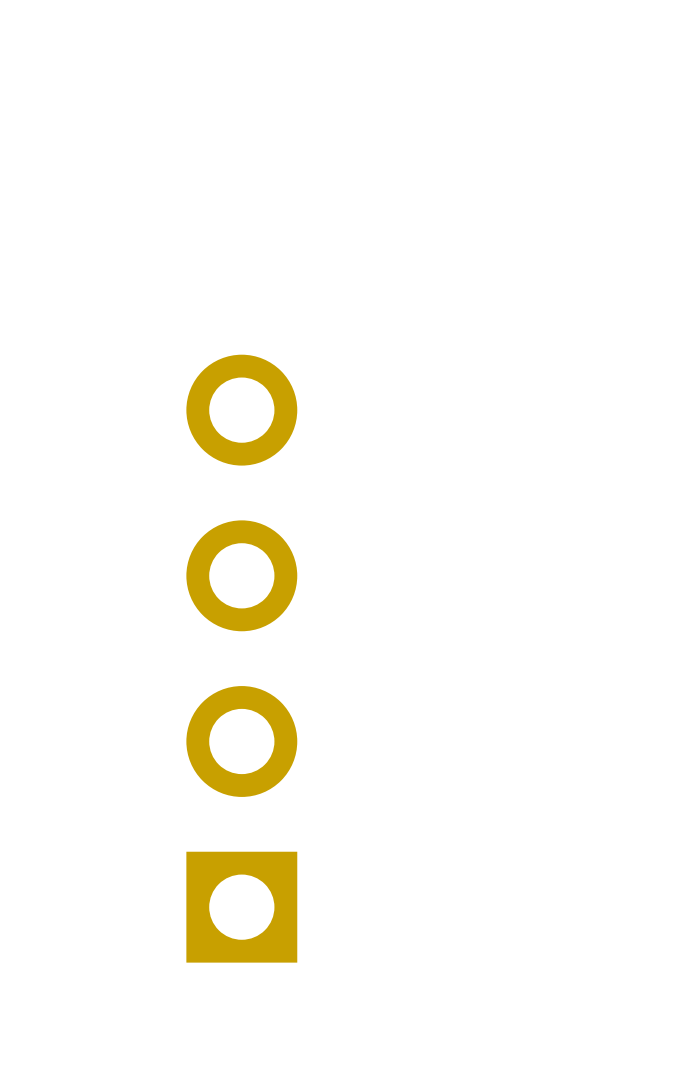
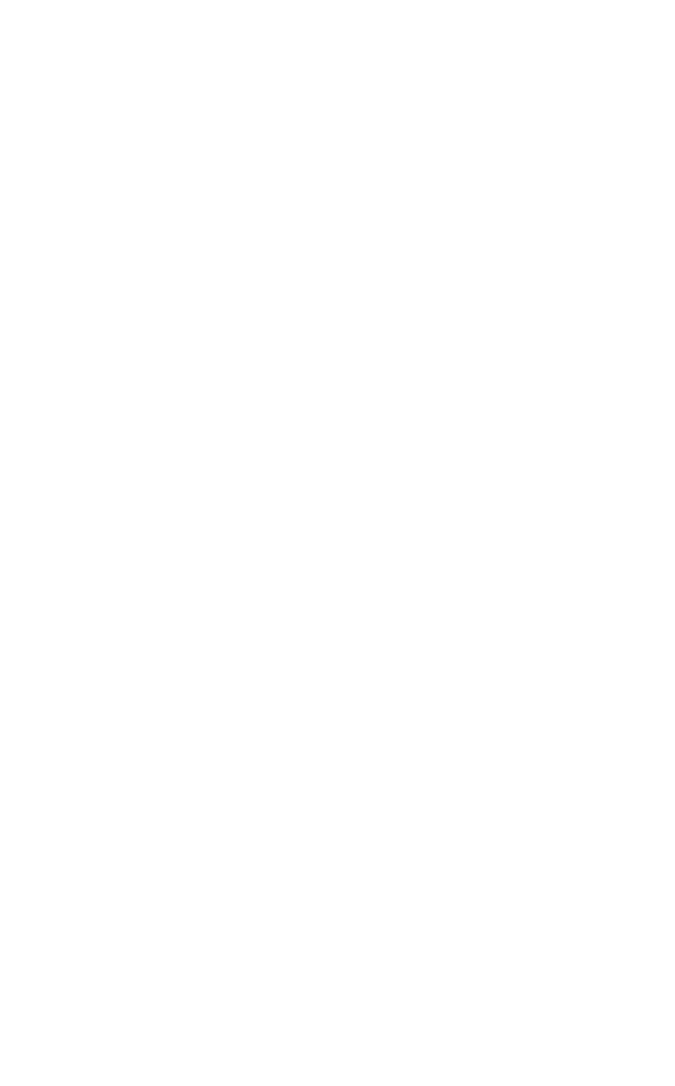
part: (241, 658) -> none

